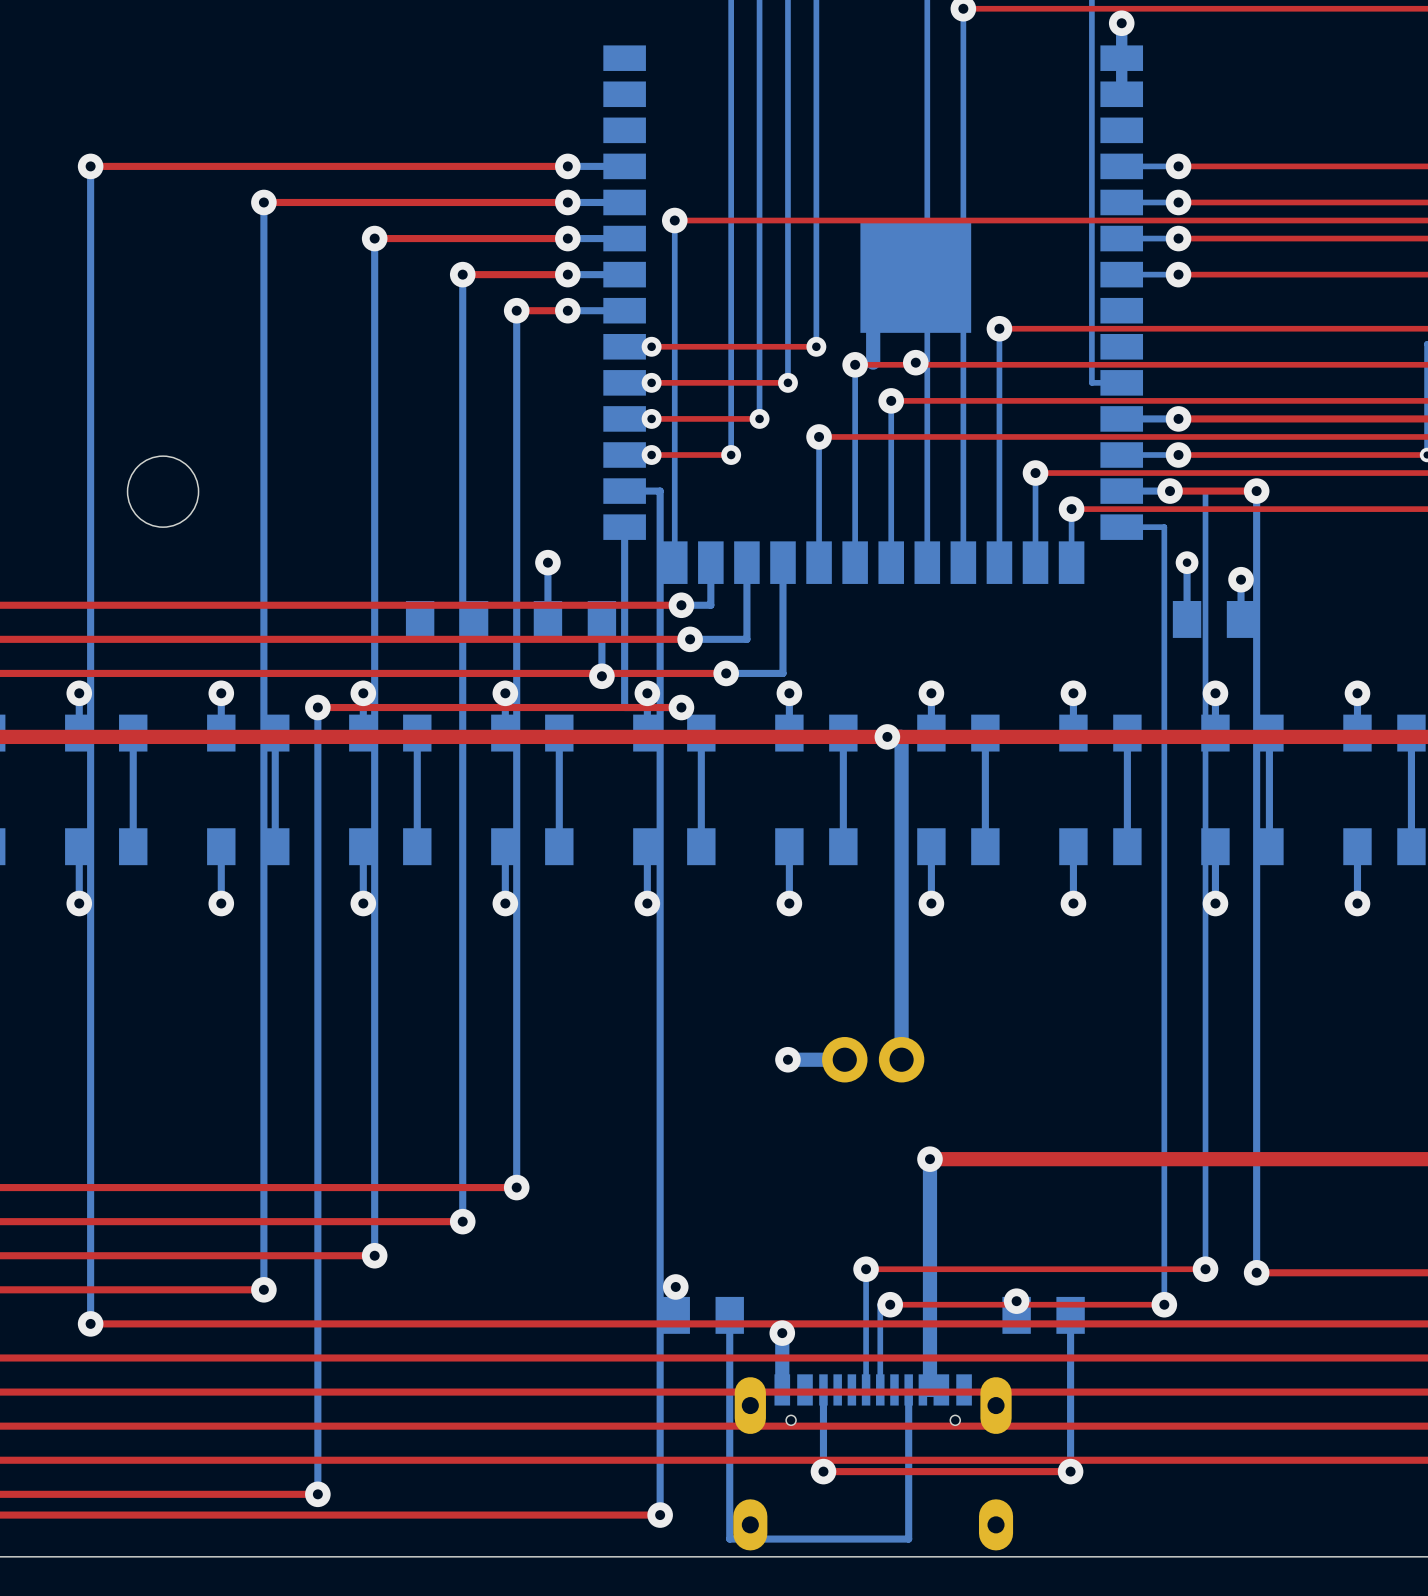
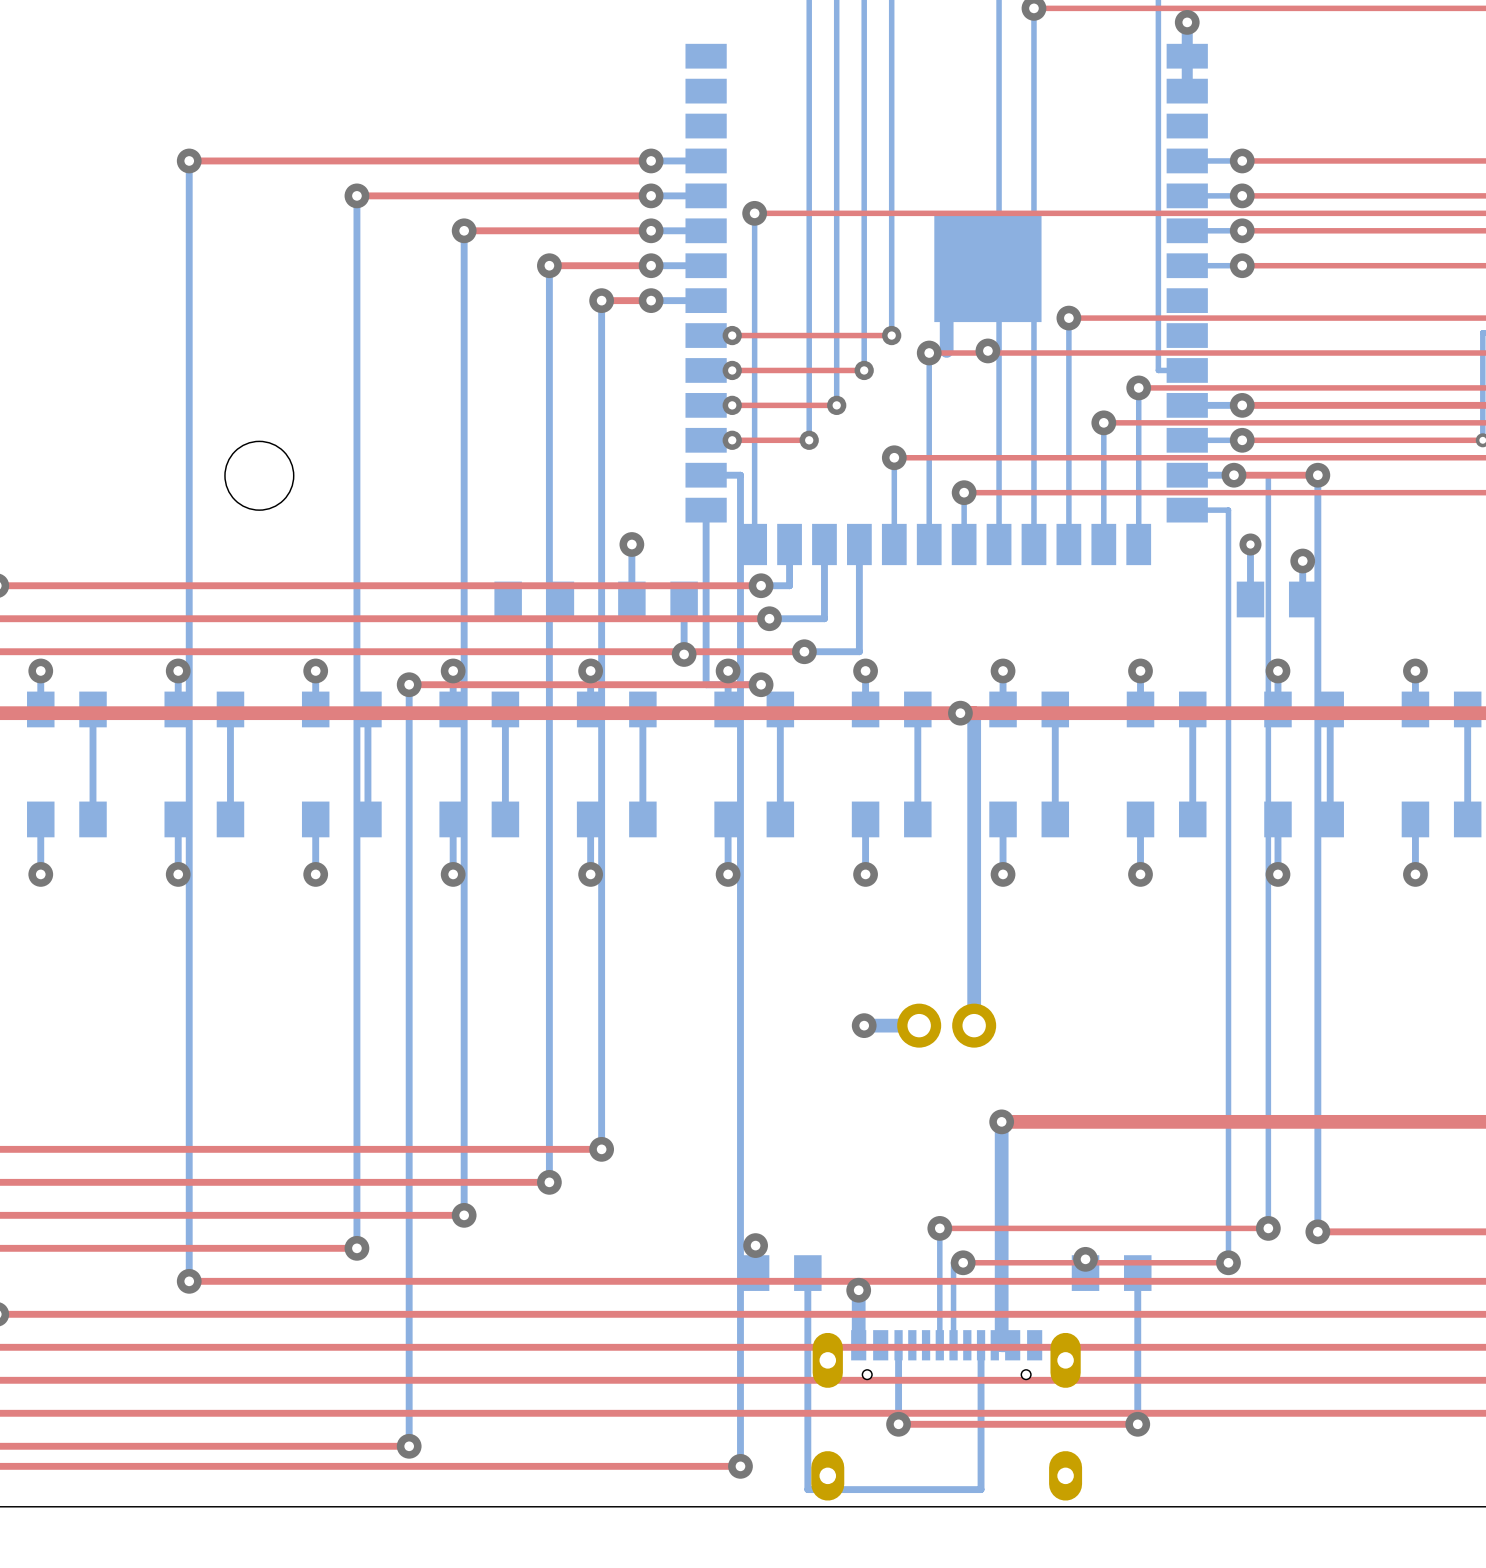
bottom track: (891, 400) (891, 509) -> (1138, 387) (1138, 492)
top track: (891, 400) (1071, 400) -> (964, 492) (1138, 492)
via: (891, 400) -> none
via: none -> (1138, 387)
bottom track: (819, 436) (819, 473) -> (1103, 422) (1103, 457)
top track: (819, 436) (1035, 436) -> (894, 457) (1103, 457)
via position: (819, 436) -> (894, 457)
via position: (1035, 473) -> (1103, 422)
via: none -> (964, 492)
via: (1071, 509) -> none

